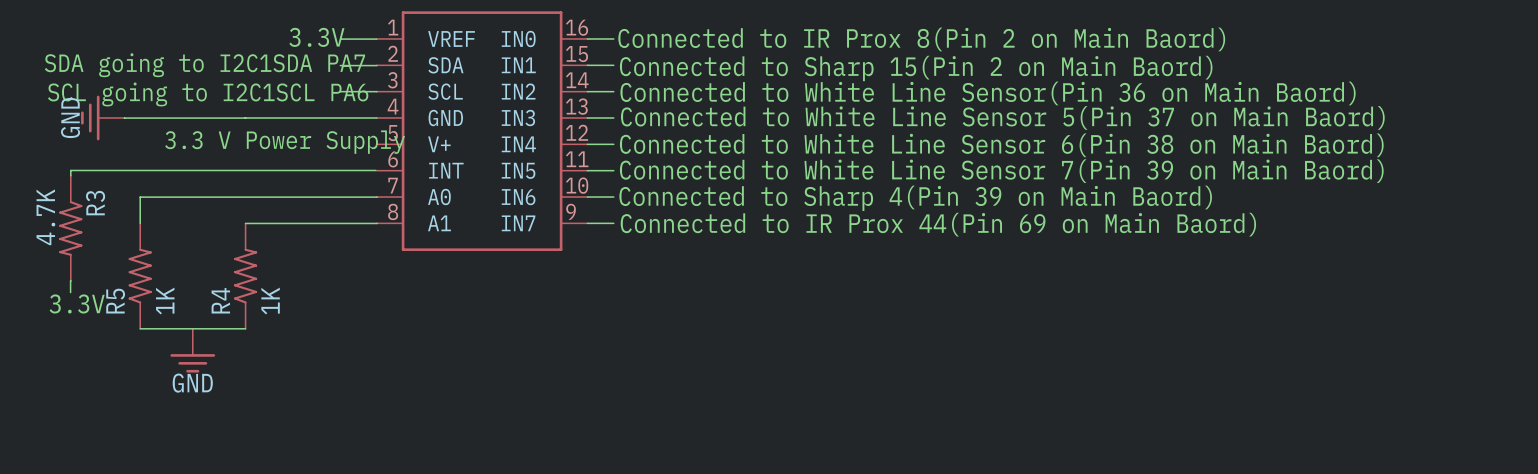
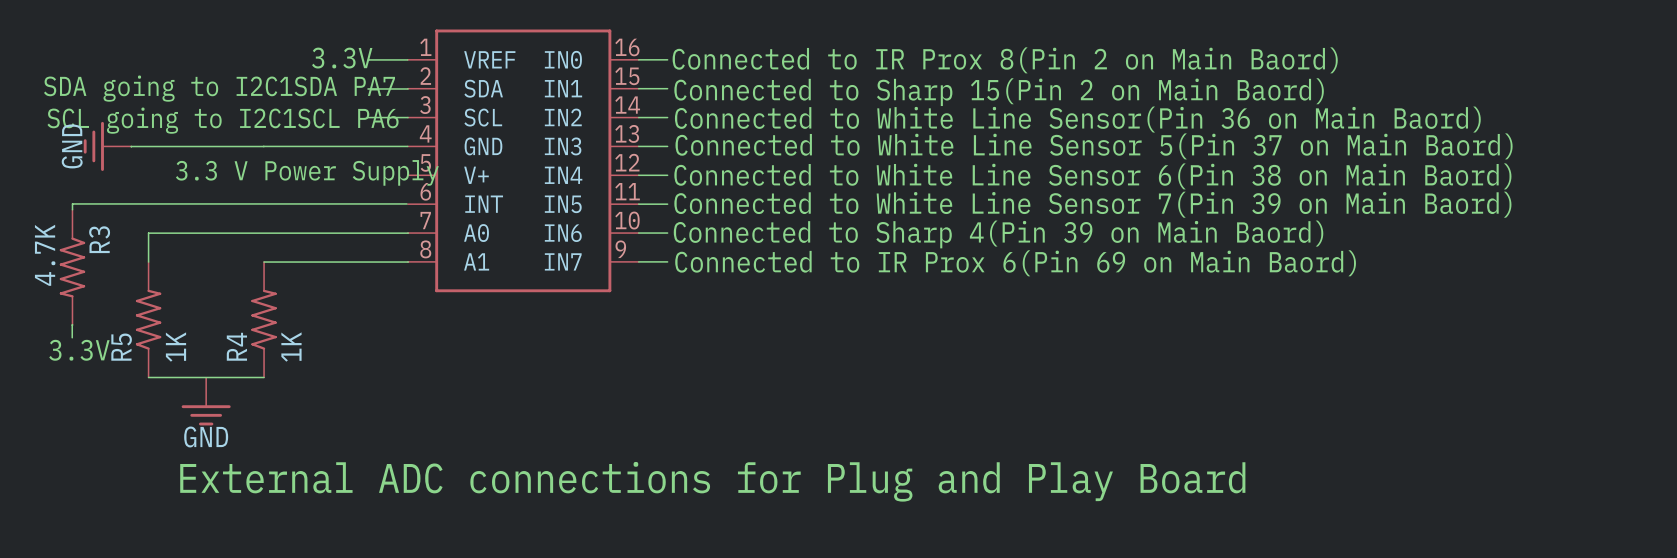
text: Connected to IR Prox 44(Pin 69 on Main Baord) (938, 224) -> Connected to IR Prox 6(Pin 69 on Main Baord) (1015, 263)
text: none -> External ADC connections for Plug and Play Board (712, 481)

